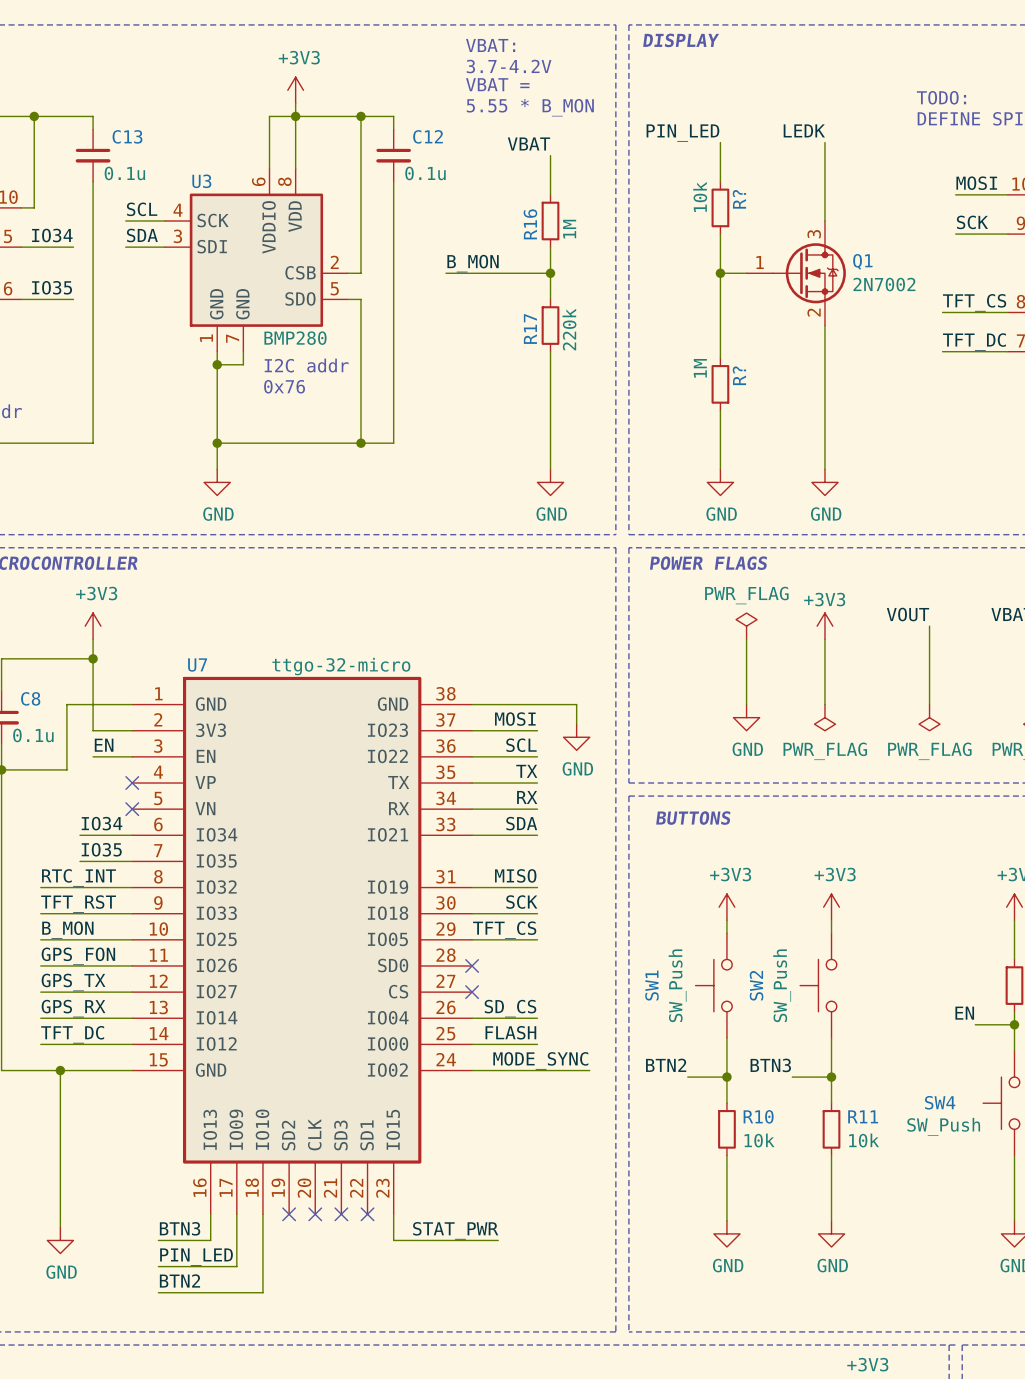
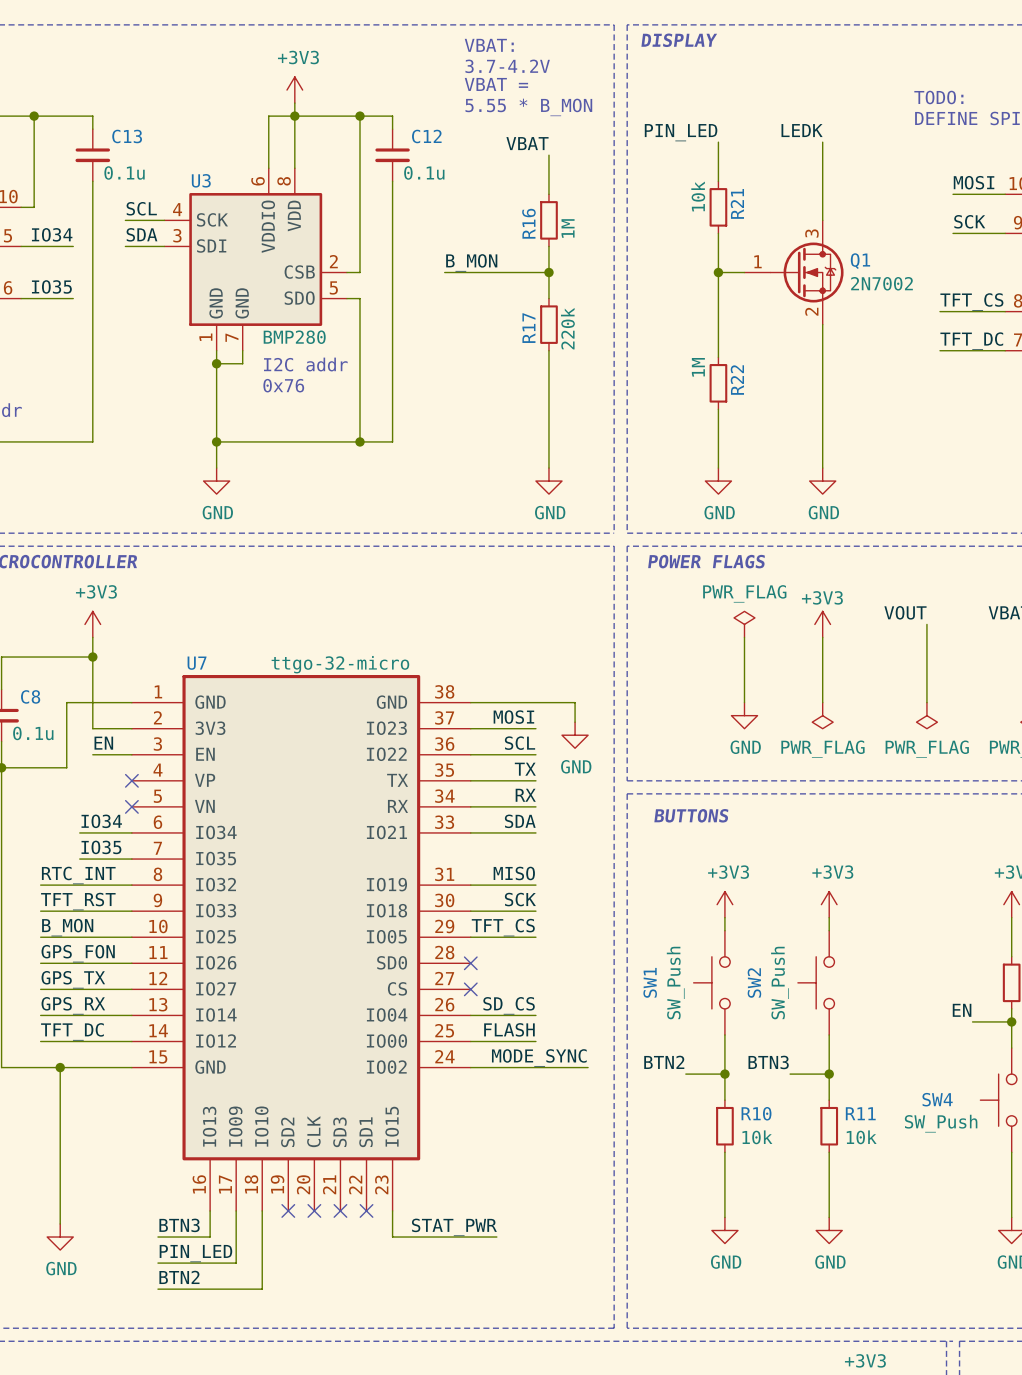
R? name: R? (739, 199) -> R21 (737, 203)
R? name: R? (739, 375) -> R22 (737, 380)

